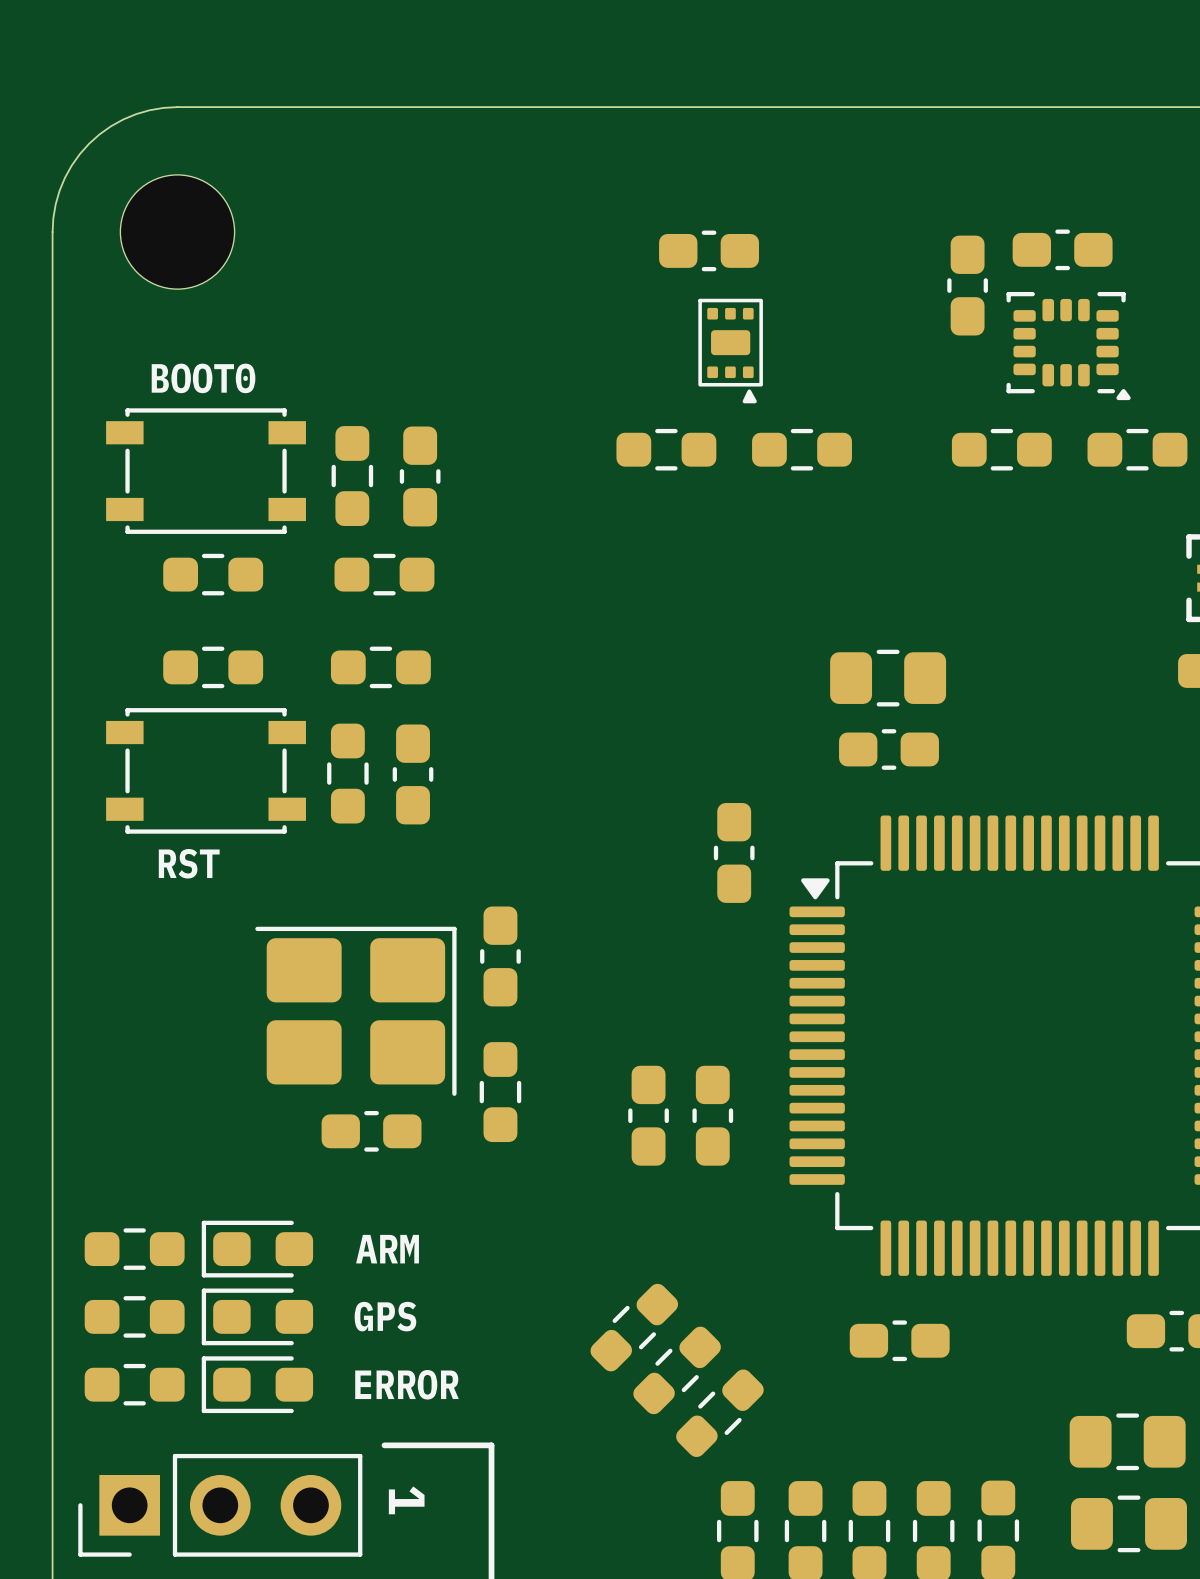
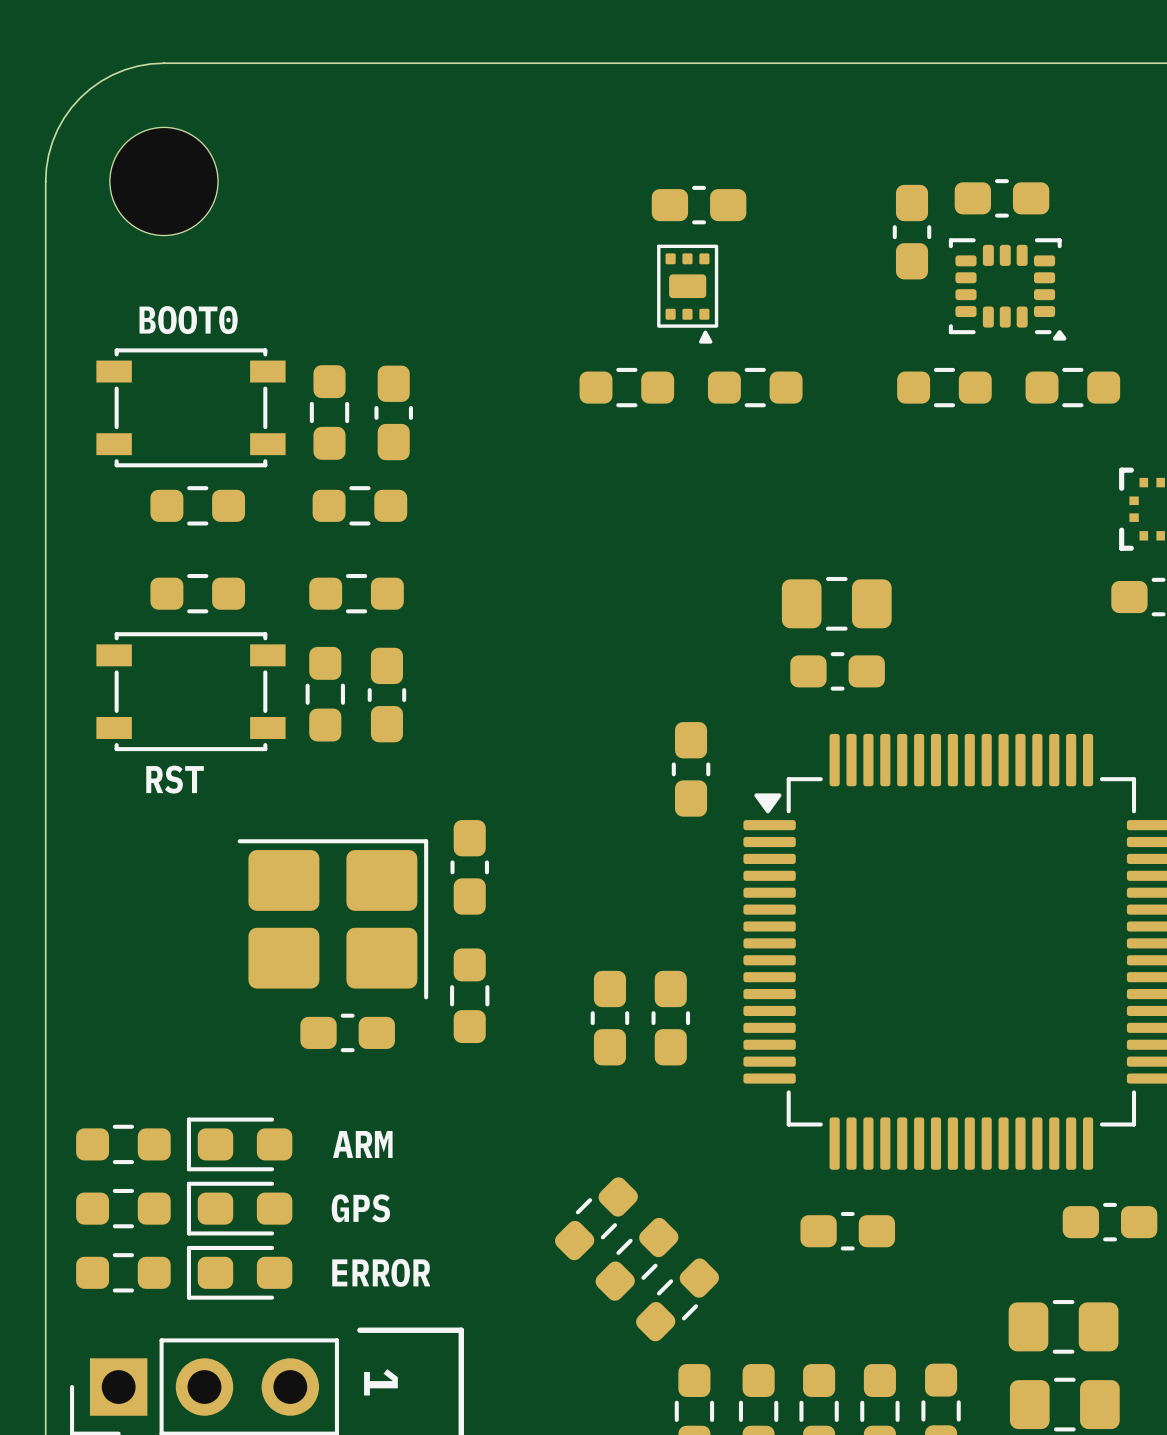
part position: (709, 250) -> (699, 205)

